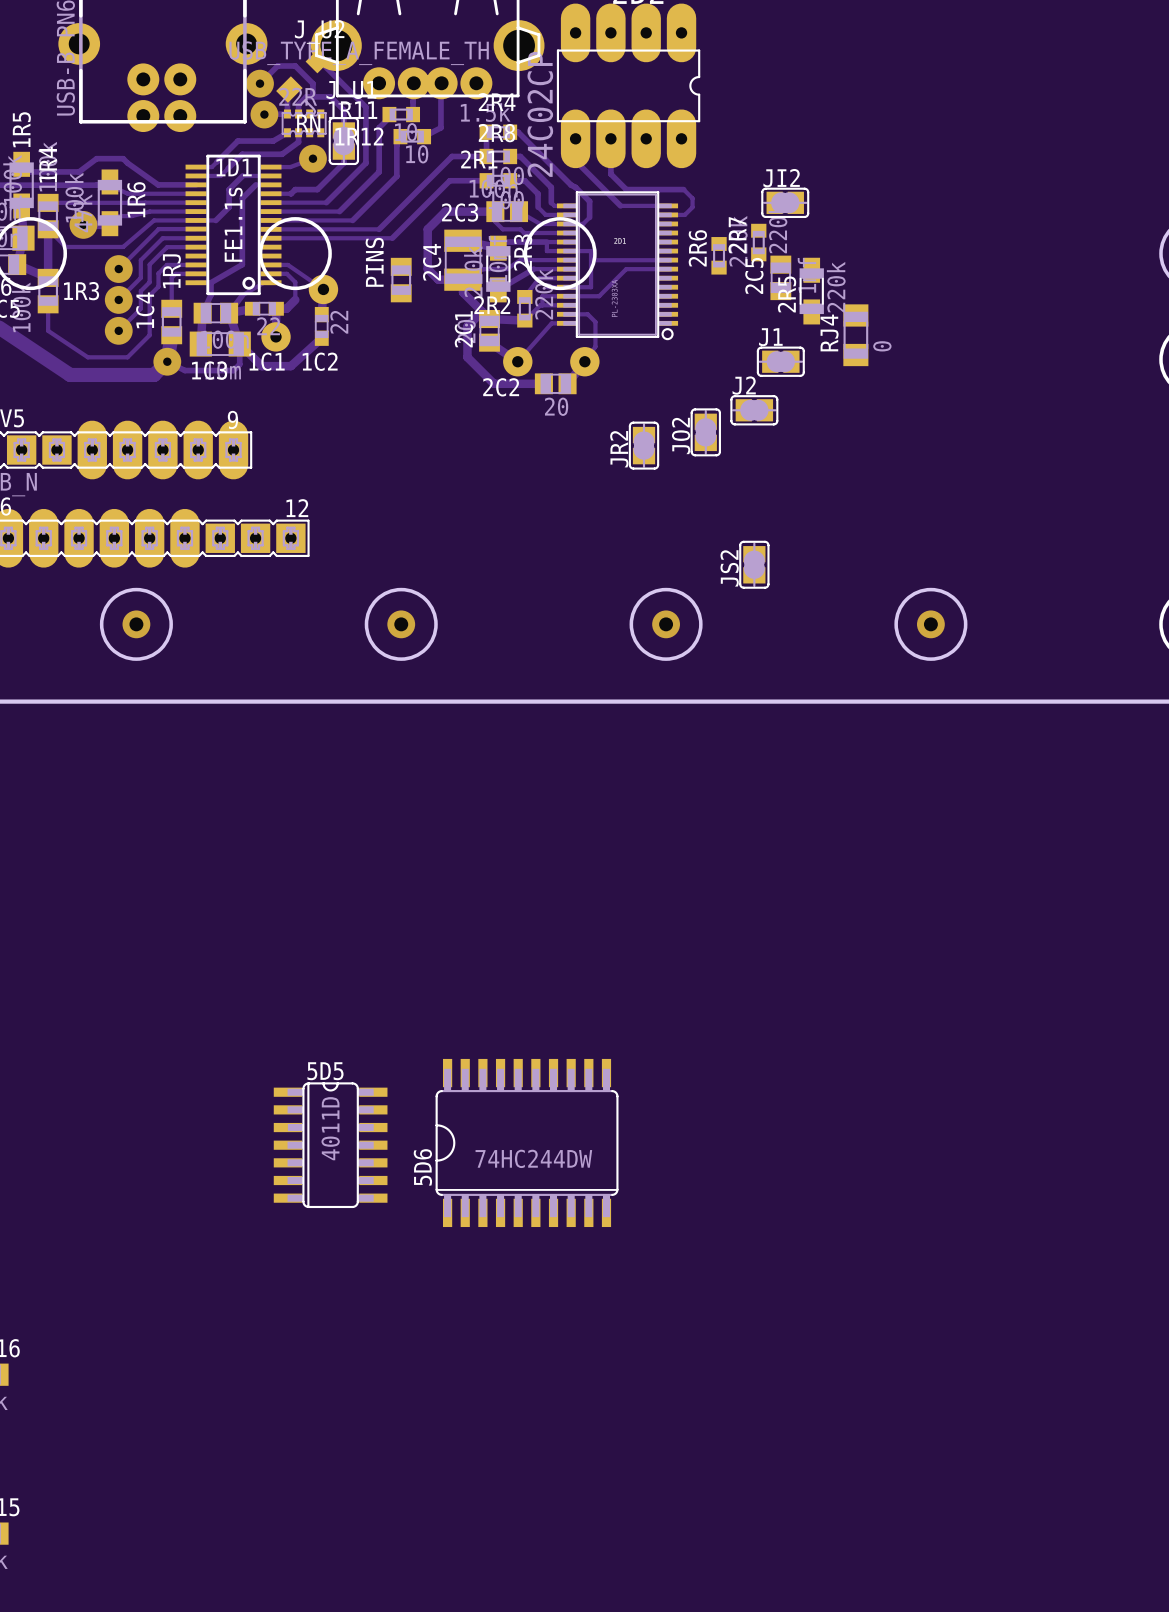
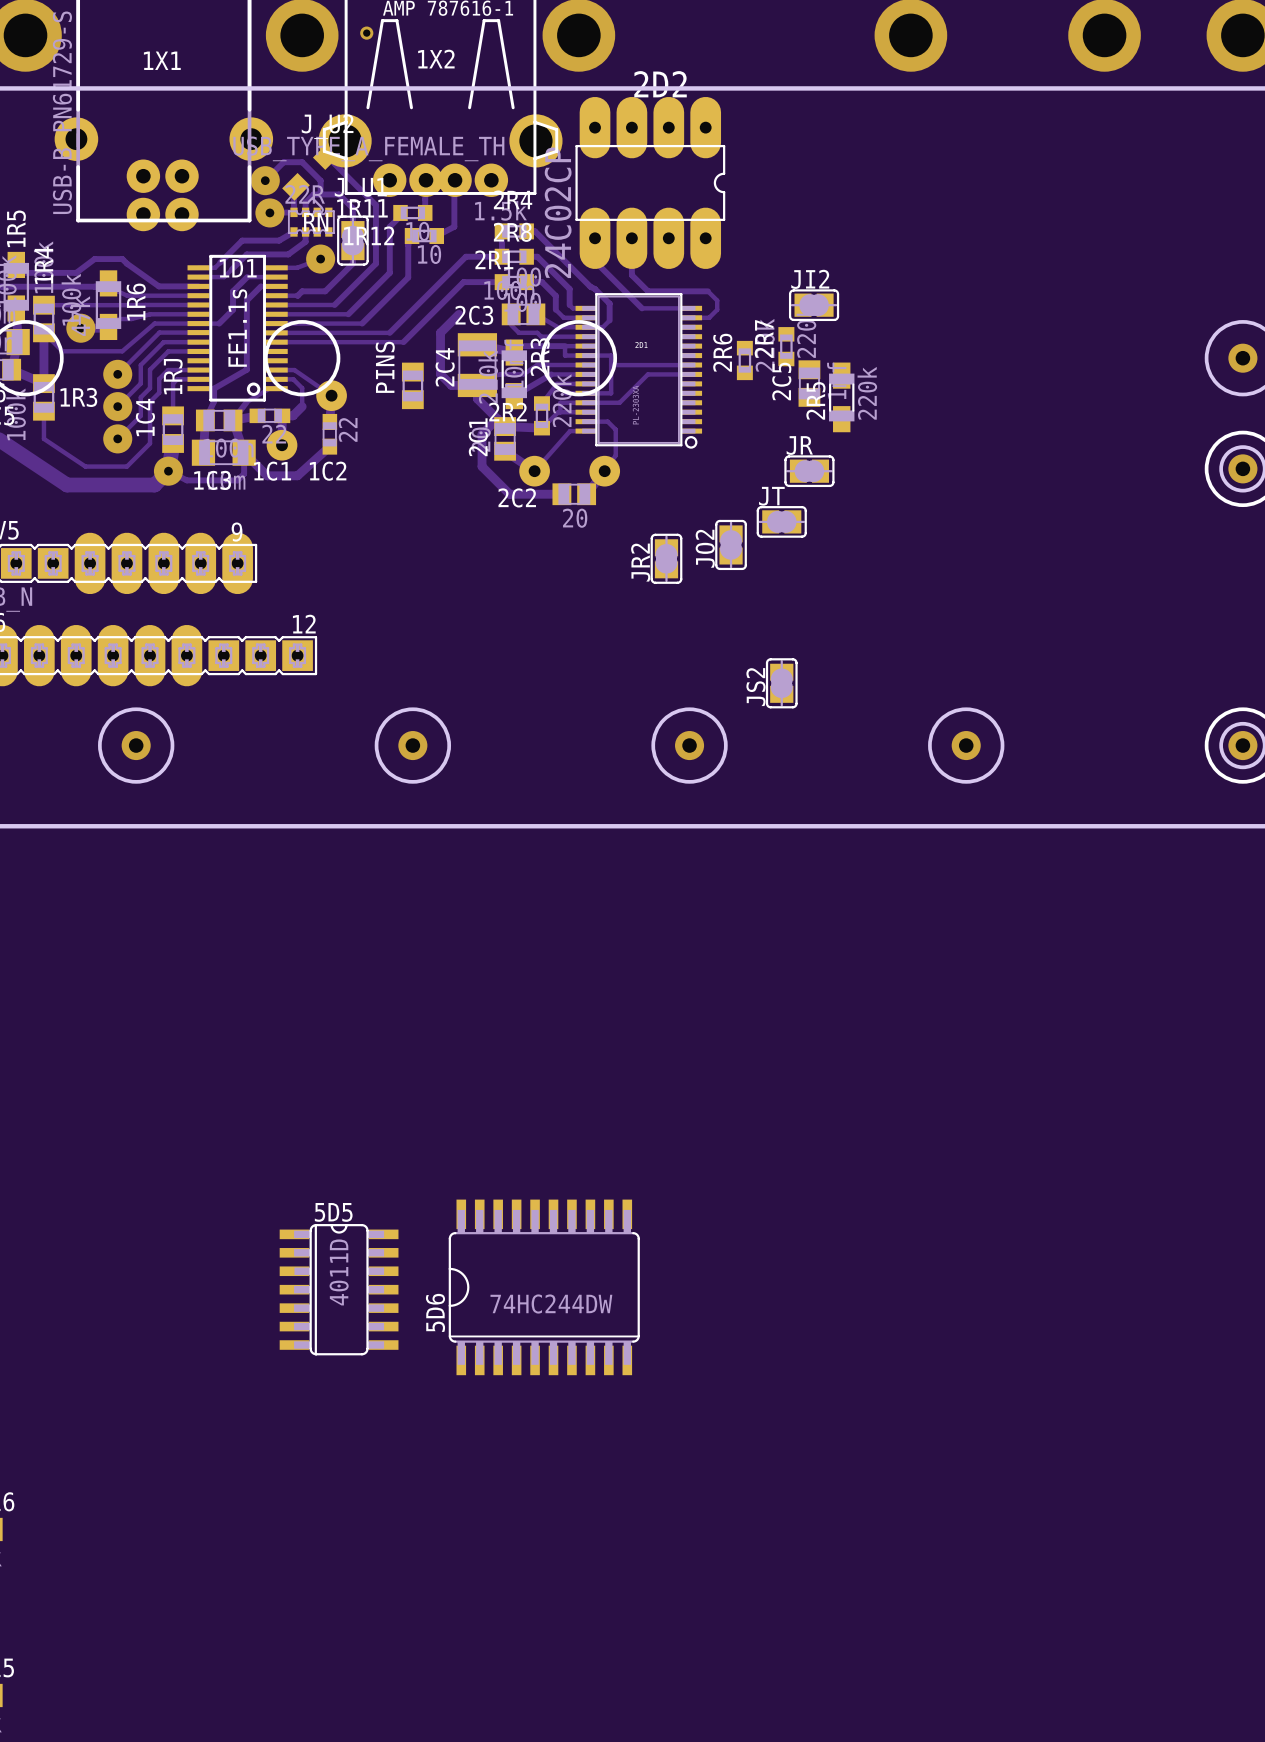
track: (445, 211) (495, 211) (495, 221) -> none
RJ4: 0 (855, 335) -> none
J1 name: J1 (770, 337) -> JR (799, 445)
J2 name: J2 (744, 385) -> JT (771, 496)

